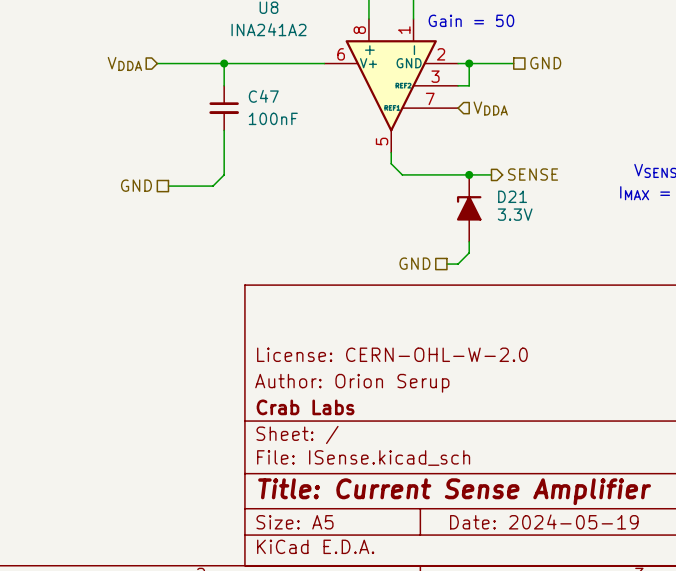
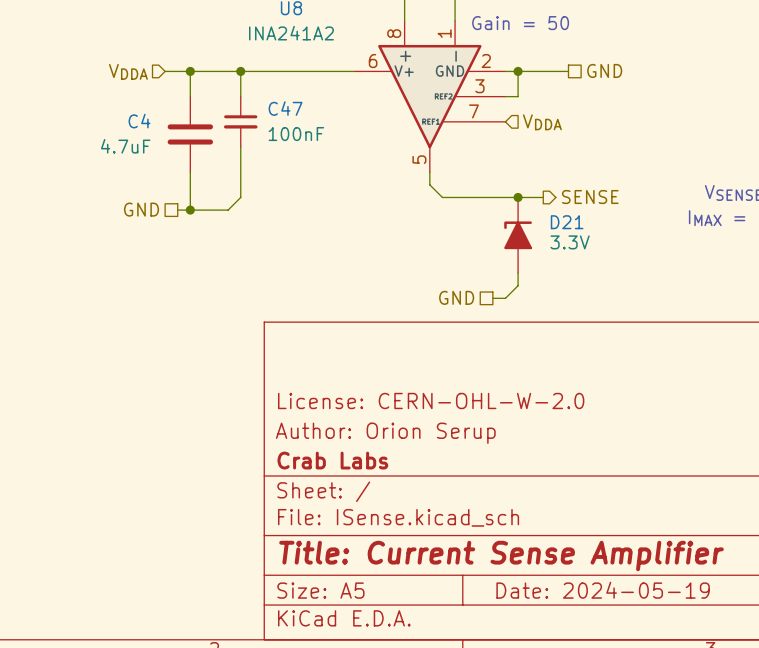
wire: none -> (190, 71) (190, 96)
junction: none -> (190, 71)
C4: none -> 4.7uF (190, 134)
wire: none -> (190, 172) (190, 210)
junction: none -> (190, 210)

